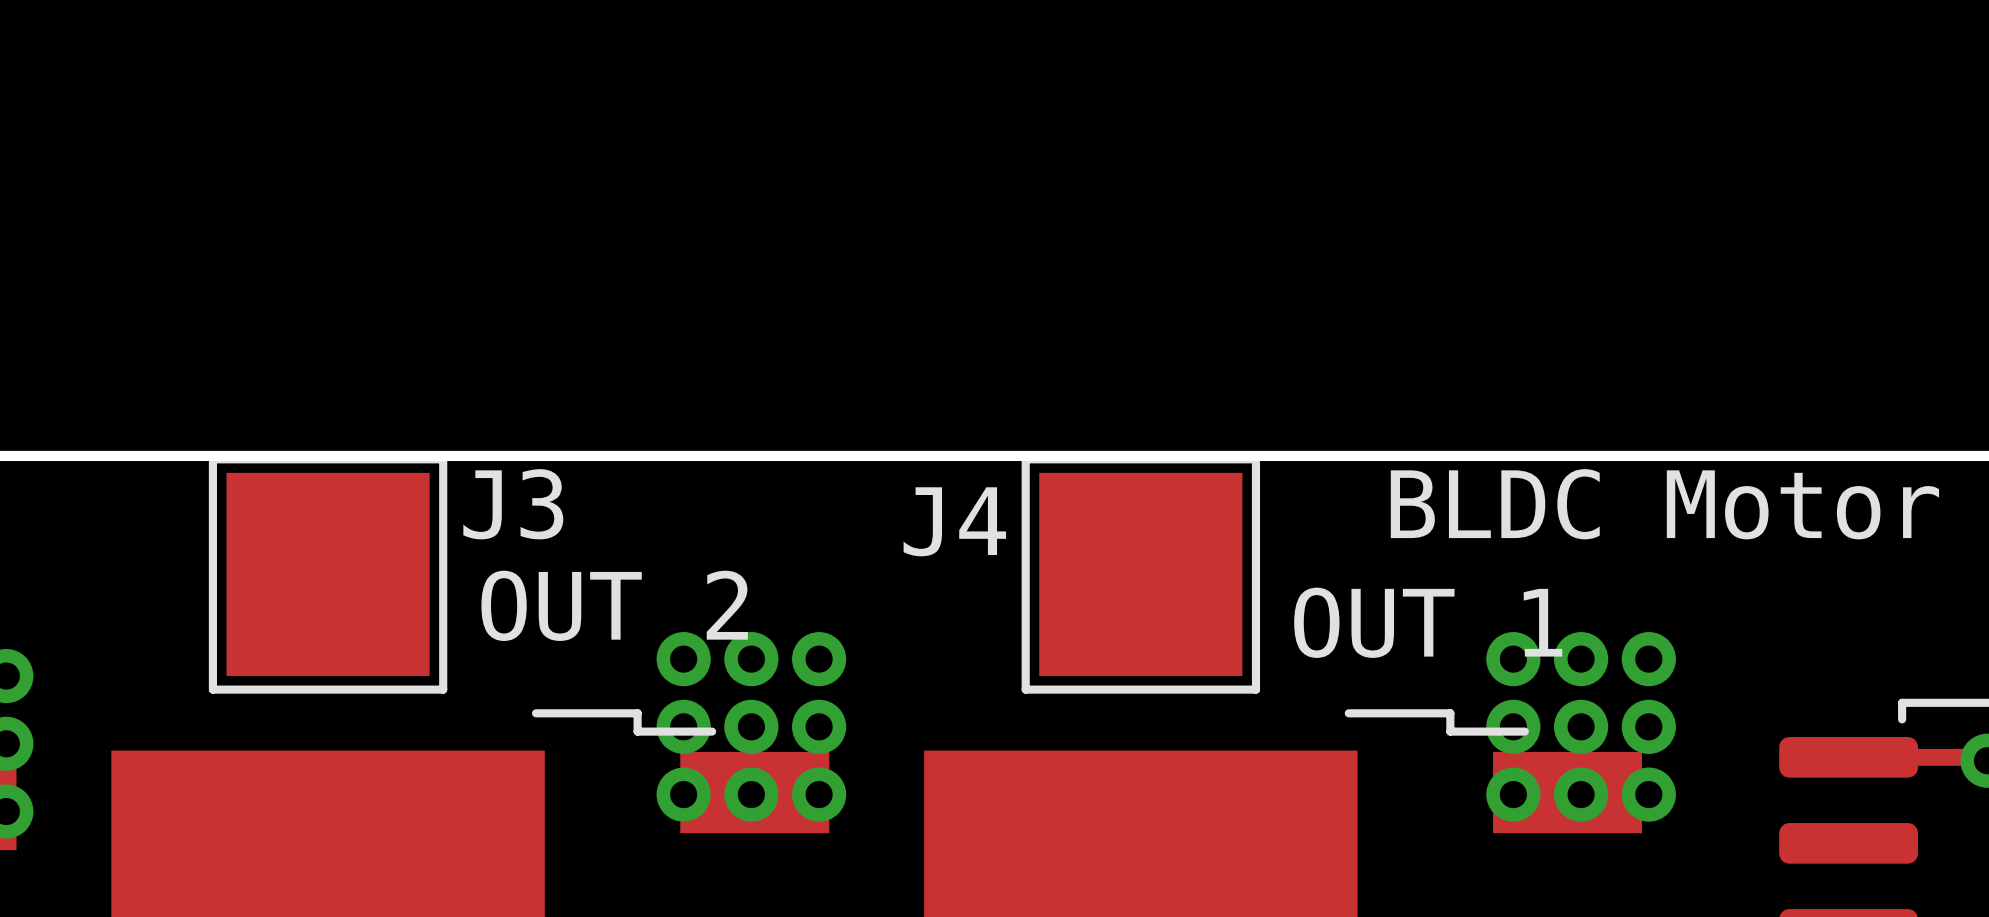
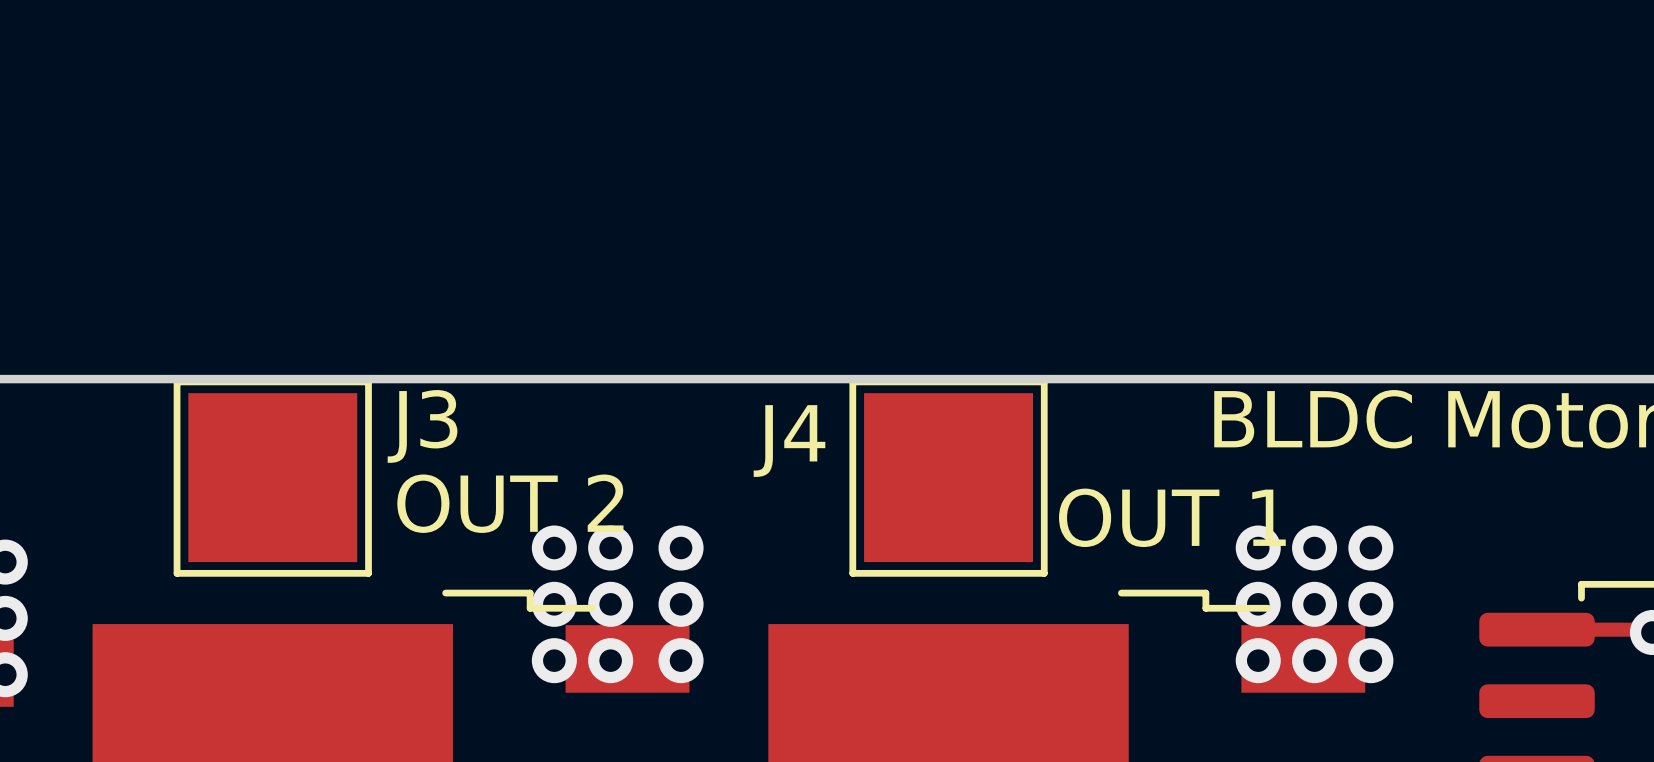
text position: OUT 1 (1428, 622) -> OUT 1 (1172, 517)
via position: (683, 659) -> (554, 548)
via position: (751, 659) -> (610, 548)
via position: (683, 726) -> (554, 604)
via position: (751, 726) -> (610, 604)
via position: (683, 794) -> (554, 660)
via position: (751, 794) -> (610, 660)

